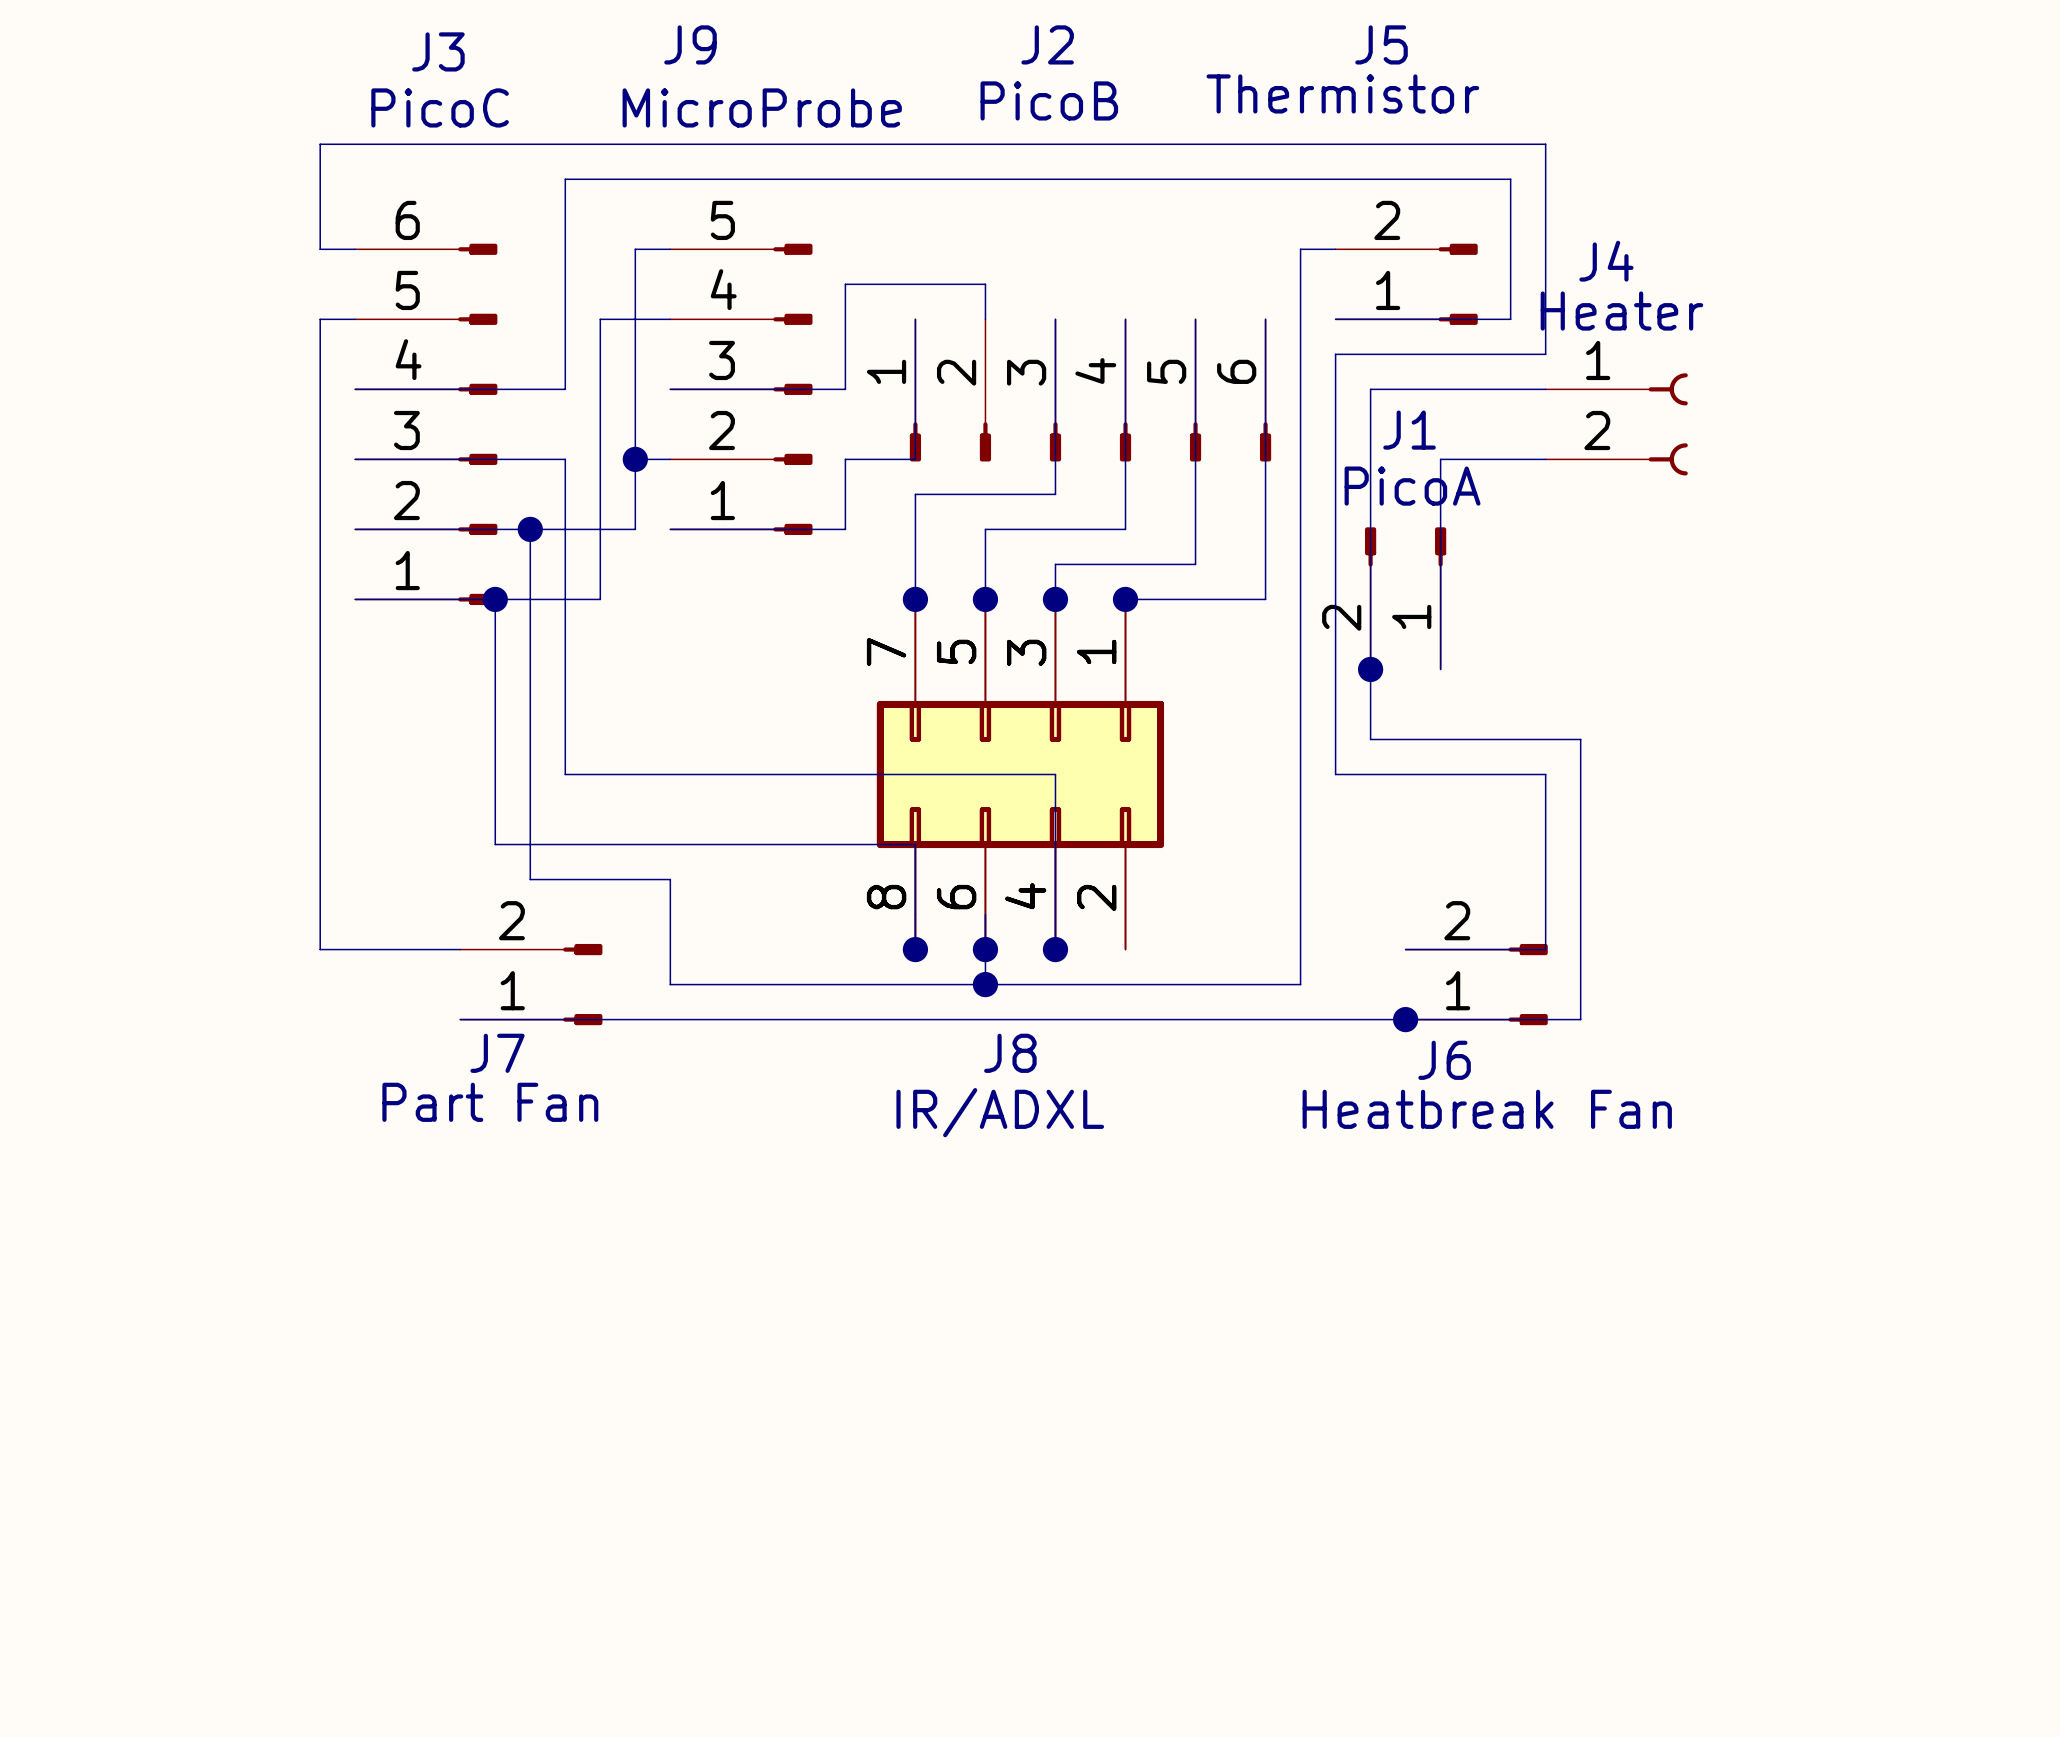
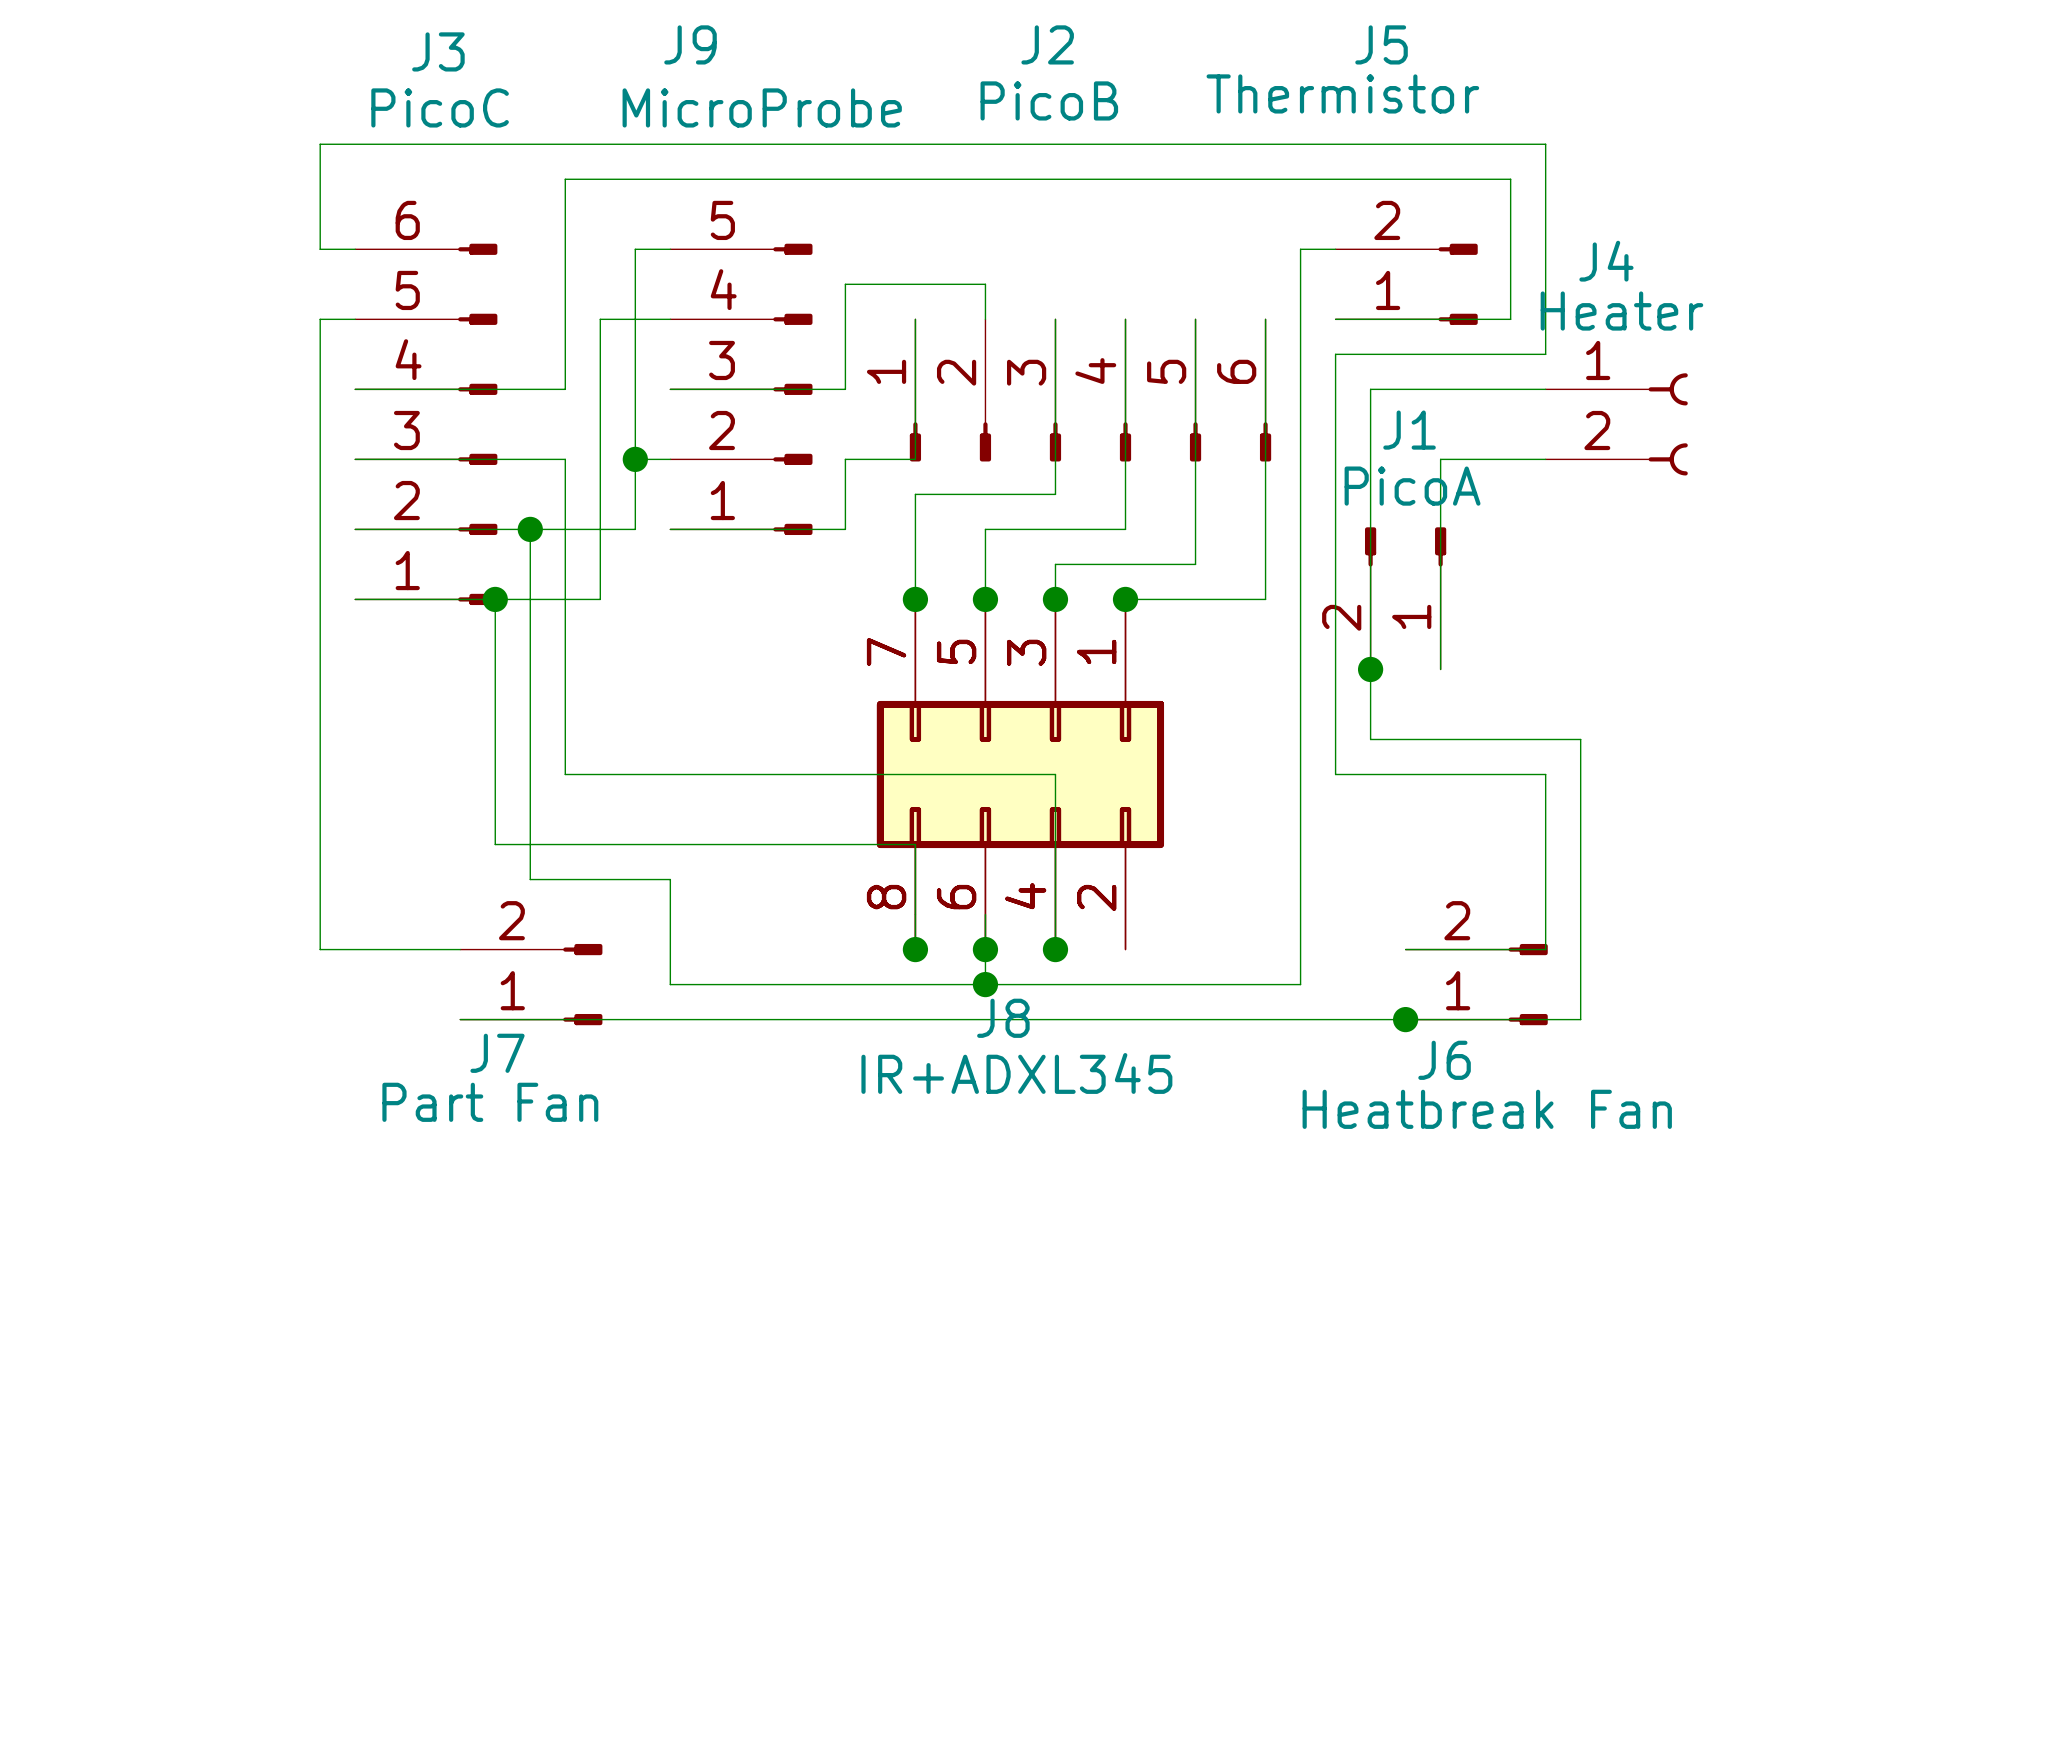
J8 name position: J8 (1010, 1053) -> J8 (1003, 1018)
J8 value: IR/ADXL (1000, 1112) -> IR+ADXL345 (1016, 1073)

